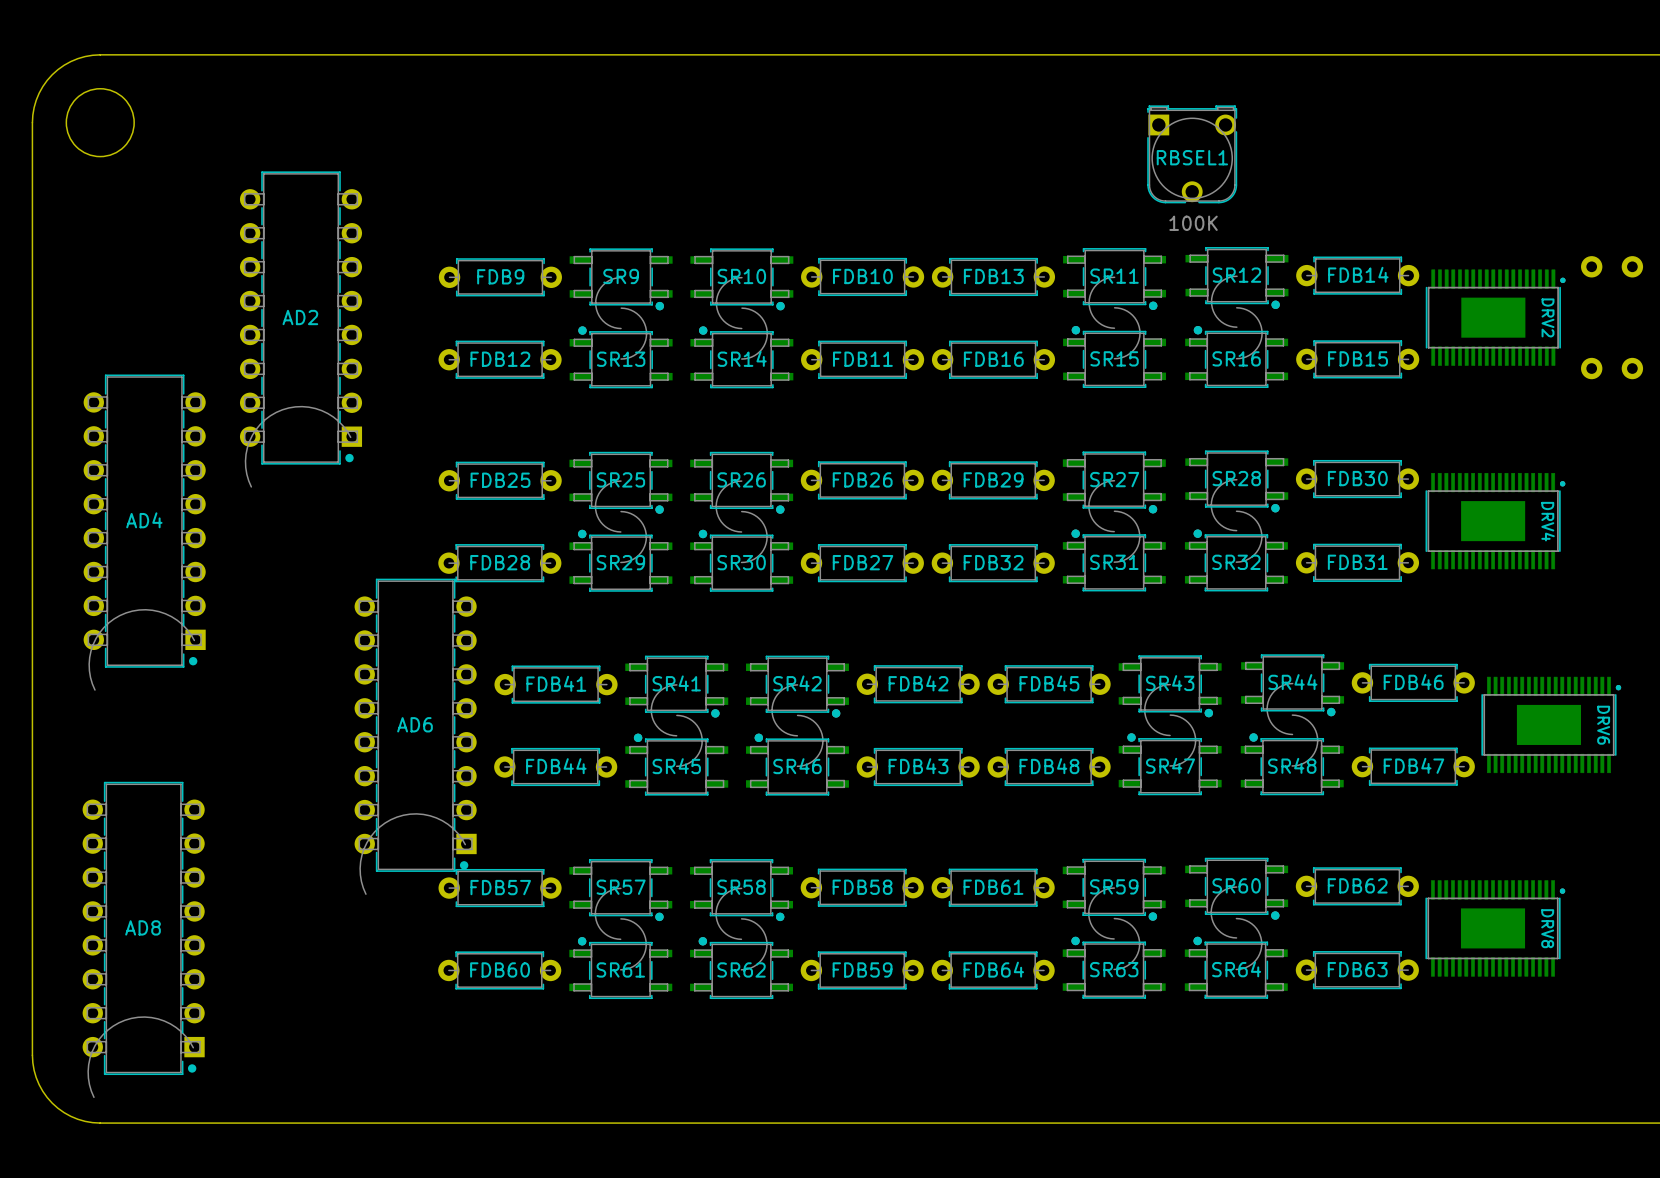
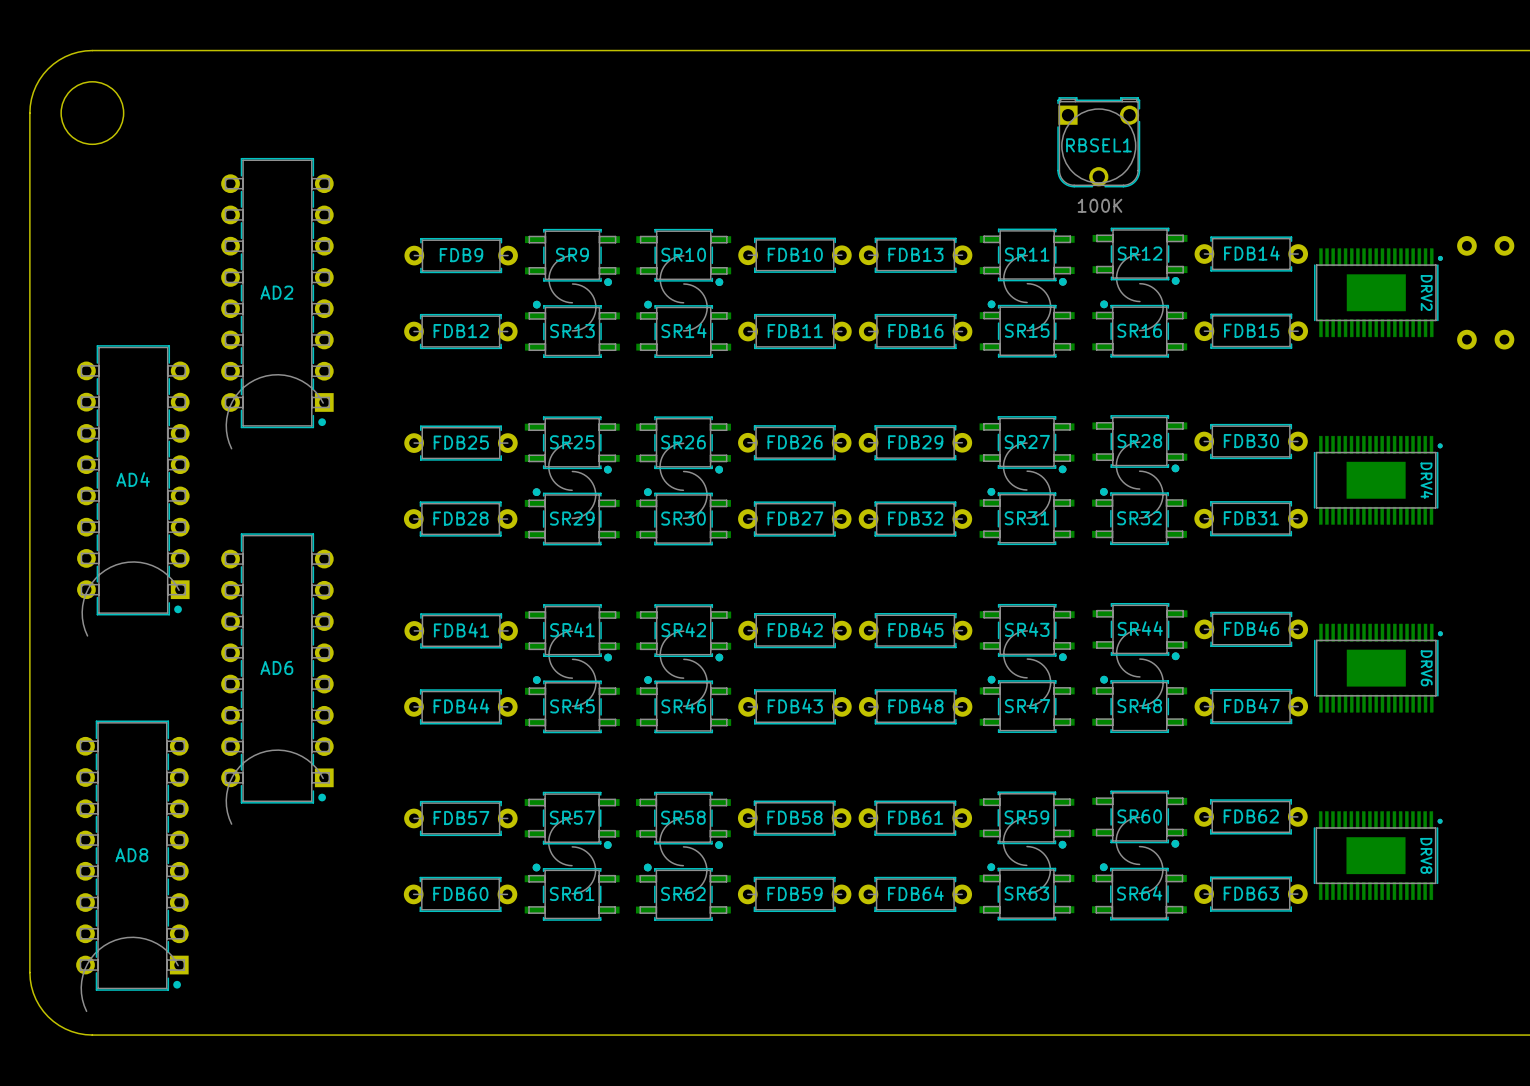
FDB46 position: (1413, 682) -> (1251, 629)
FDB41 position: (556, 684) -> (461, 630)
FDB42 position: (918, 684) -> (794, 630)
FDB45 position: (1049, 684) -> (915, 630)
SR44 position: (1292, 694) -> (1140, 640)
SR43 position: (1170, 695) -> (1027, 641)
SR41 position: (676, 696) -> (572, 641)
SR42 position: (797, 696) -> (683, 641)
DRV6 position: (1551, 724) -> (1378, 668)
AD6 position: (415, 736) -> (277, 679)
SR47 position: (1170, 754) -> (1027, 695)
SR48 position: (1292, 754) -> (1139, 695)
SR45 position: (676, 755) -> (572, 695)
SR46 position: (797, 755) -> (683, 695)
FDB44 position: (555, 766) -> (460, 706)
FDB43 position: (918, 766) -> (794, 706)
FDB48 position: (1049, 766) -> (915, 706)
FDB47 position: (1413, 766) -> (1251, 706)

